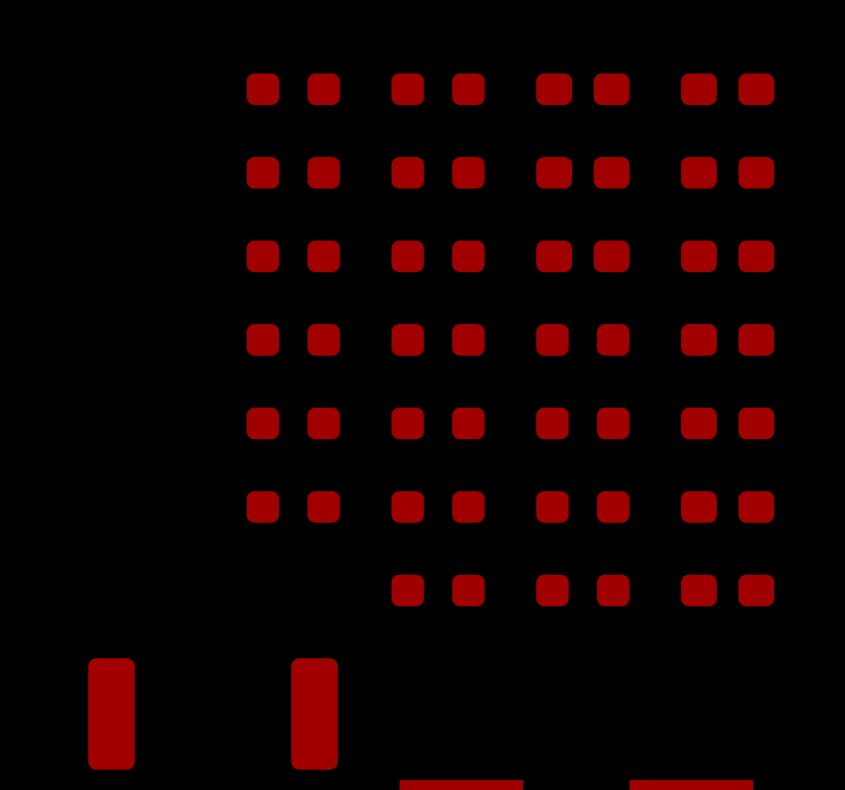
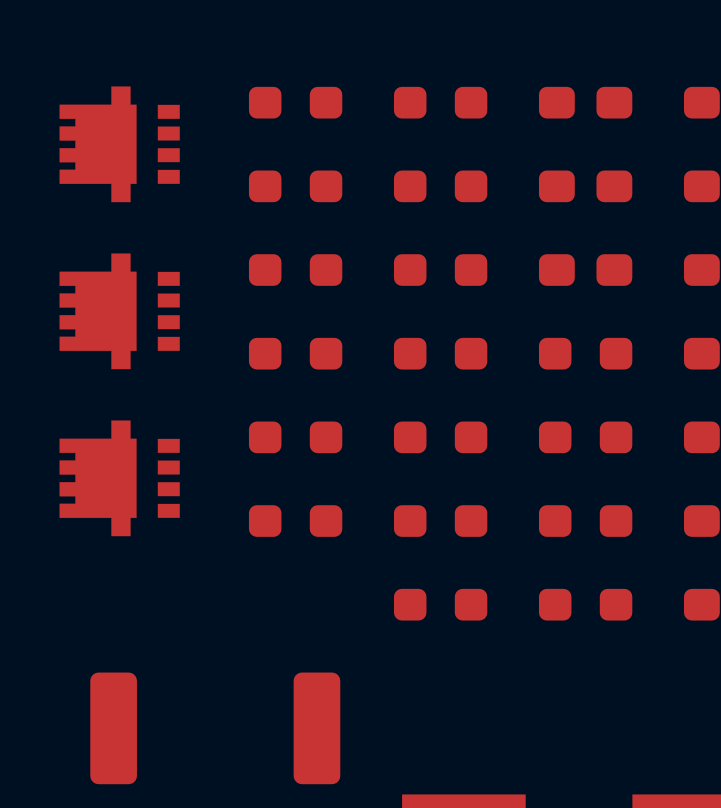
part: none -> (119, 144)
part: none -> (119, 311)
part: none -> (119, 478)

